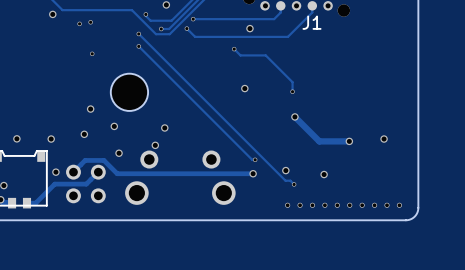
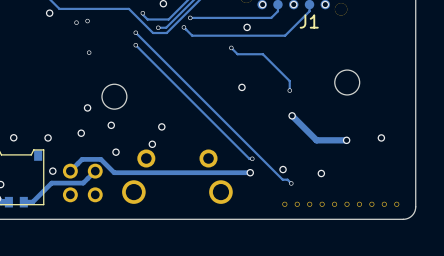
round board edge: none -> [334, 69, 361, 96]
round board edge: none -> [101, 83, 128, 110]
part: (129, 92) -> none

